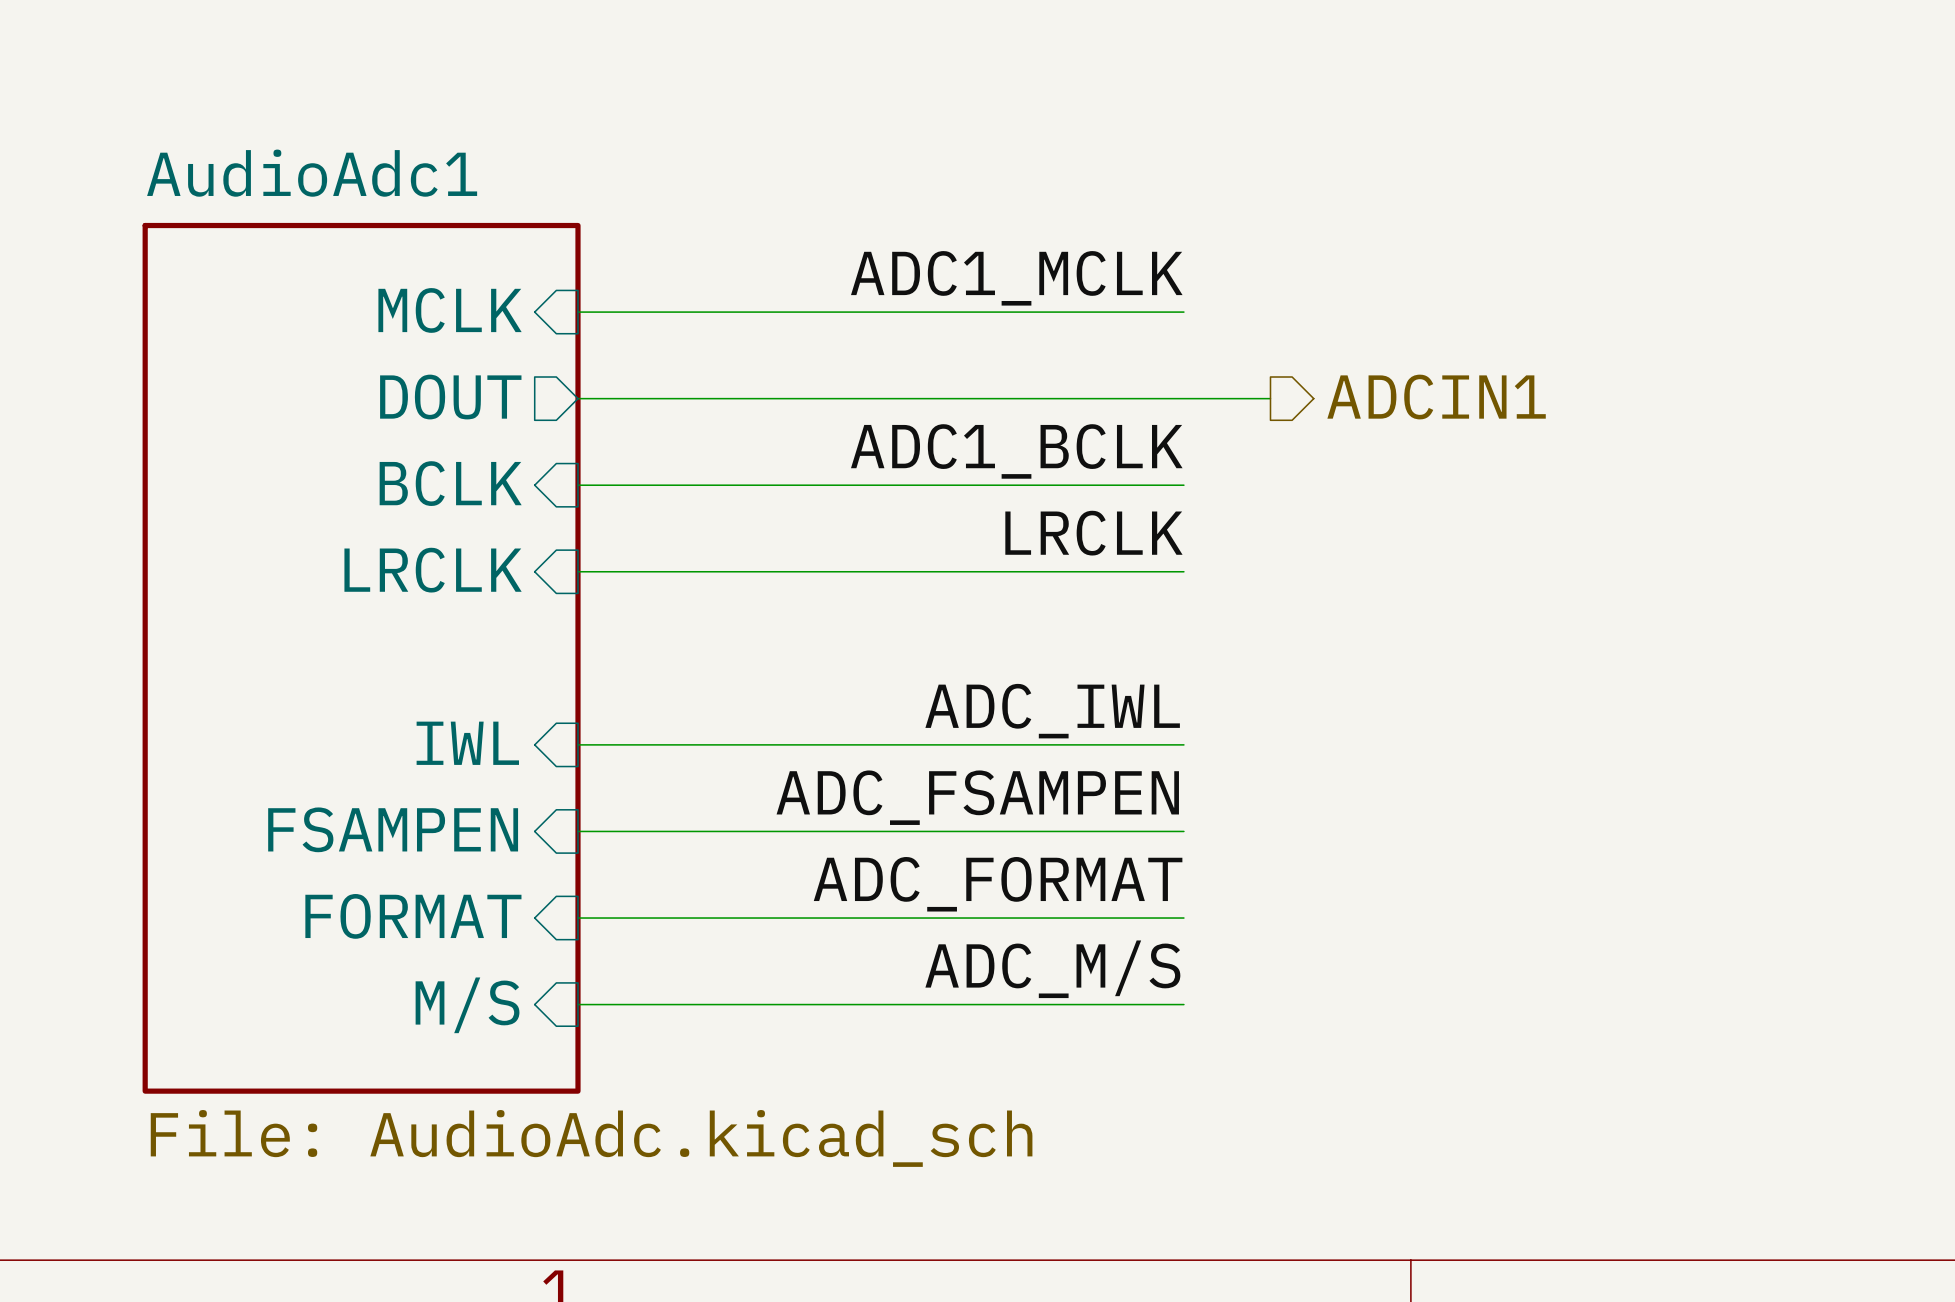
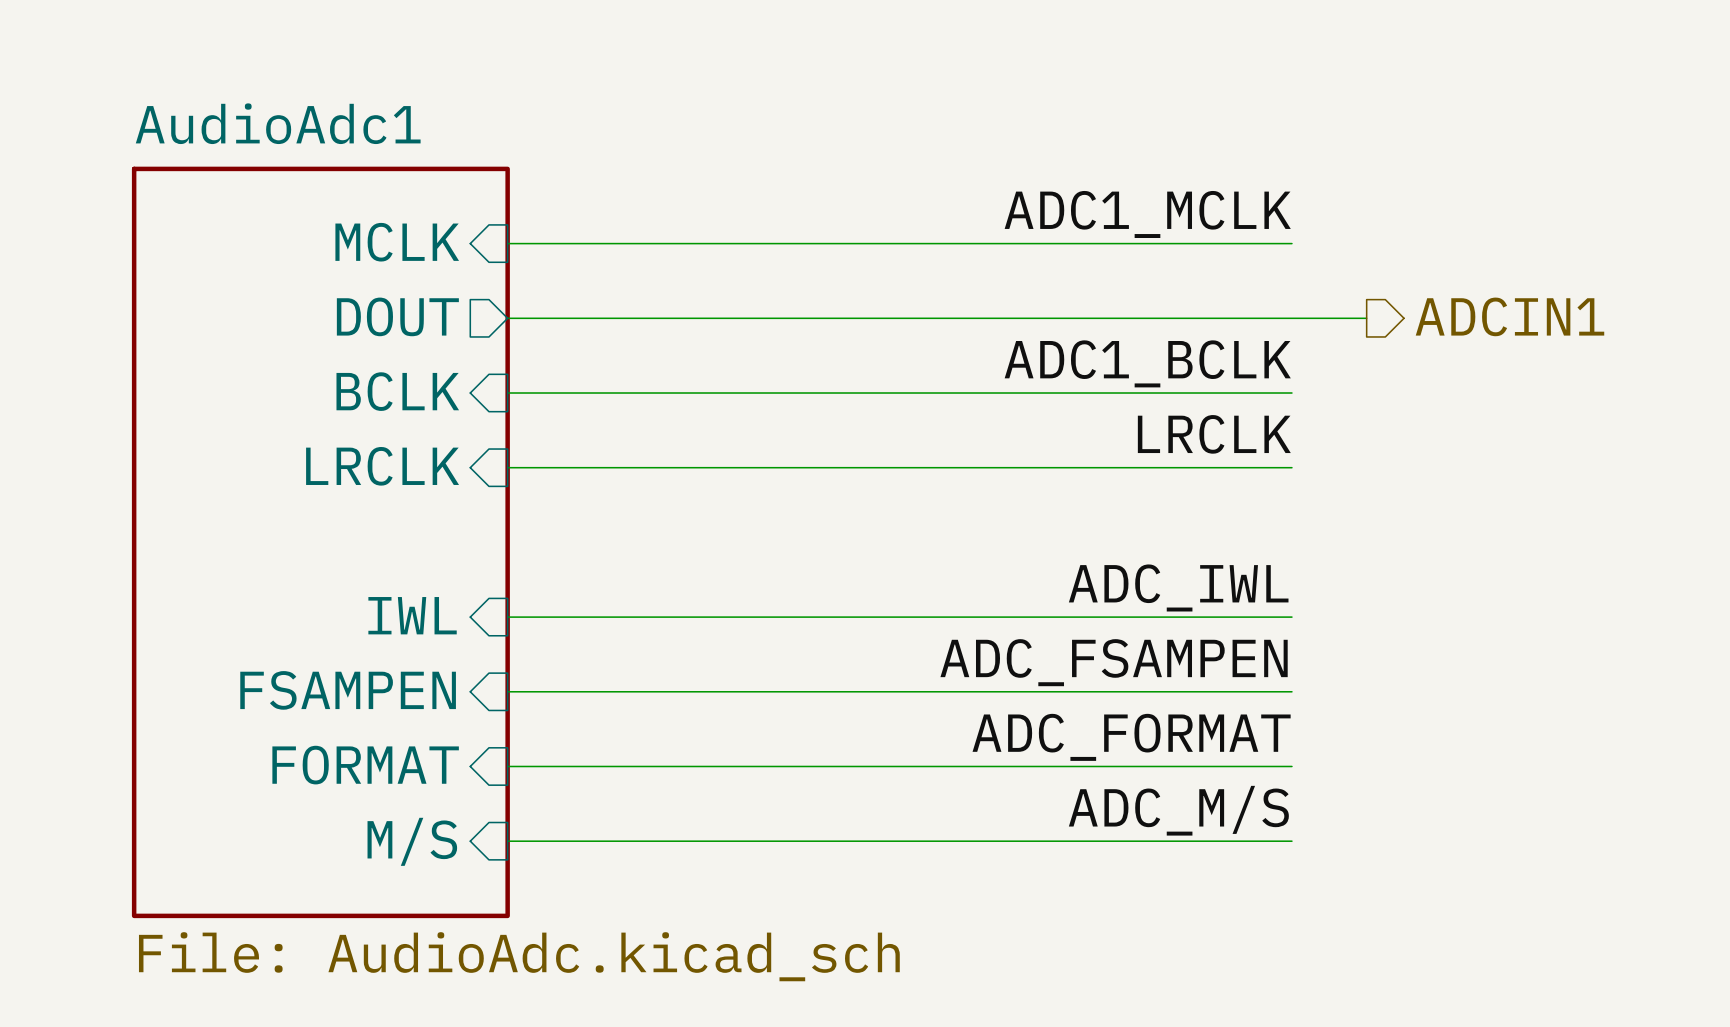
label position: ADC1_MCLK (1016, 278) -> ADC1_MCLK (1147, 214)
wire: none -> (1030, 243) (1291, 243)
hierarchical label position: ADCIN1 (1436, 397) -> ADCIN1 (1509, 316)
wire: none -> (1105, 318) (1366, 318)
label position: ADC1_BCLK (1016, 451) -> ADC1_BCLK (1147, 363)
wire: none -> (1030, 393) (1291, 393)
label position: LRCLK (1093, 533) -> LRCLK (1214, 434)
wire: none -> (1030, 467) (1291, 467)
label position: ADC_IWL (1052, 711) -> ADC_IWL (1178, 587)
wire: none -> (1030, 617) (1291, 617)
label position: ADC_FSAMPEN (977, 797) -> ADC_FSAMPEN (1114, 662)
wire: none -> (1030, 691) (1291, 691)
label position: ADC_FORMAT (998, 884) -> ADC_FORMAT (1131, 737)
wire: none -> (1030, 766) (1291, 766)
label position: ADC_M/S (1052, 969) -> ADC_M/S (1178, 810)
wire: none -> (1030, 841) (1291, 841)

